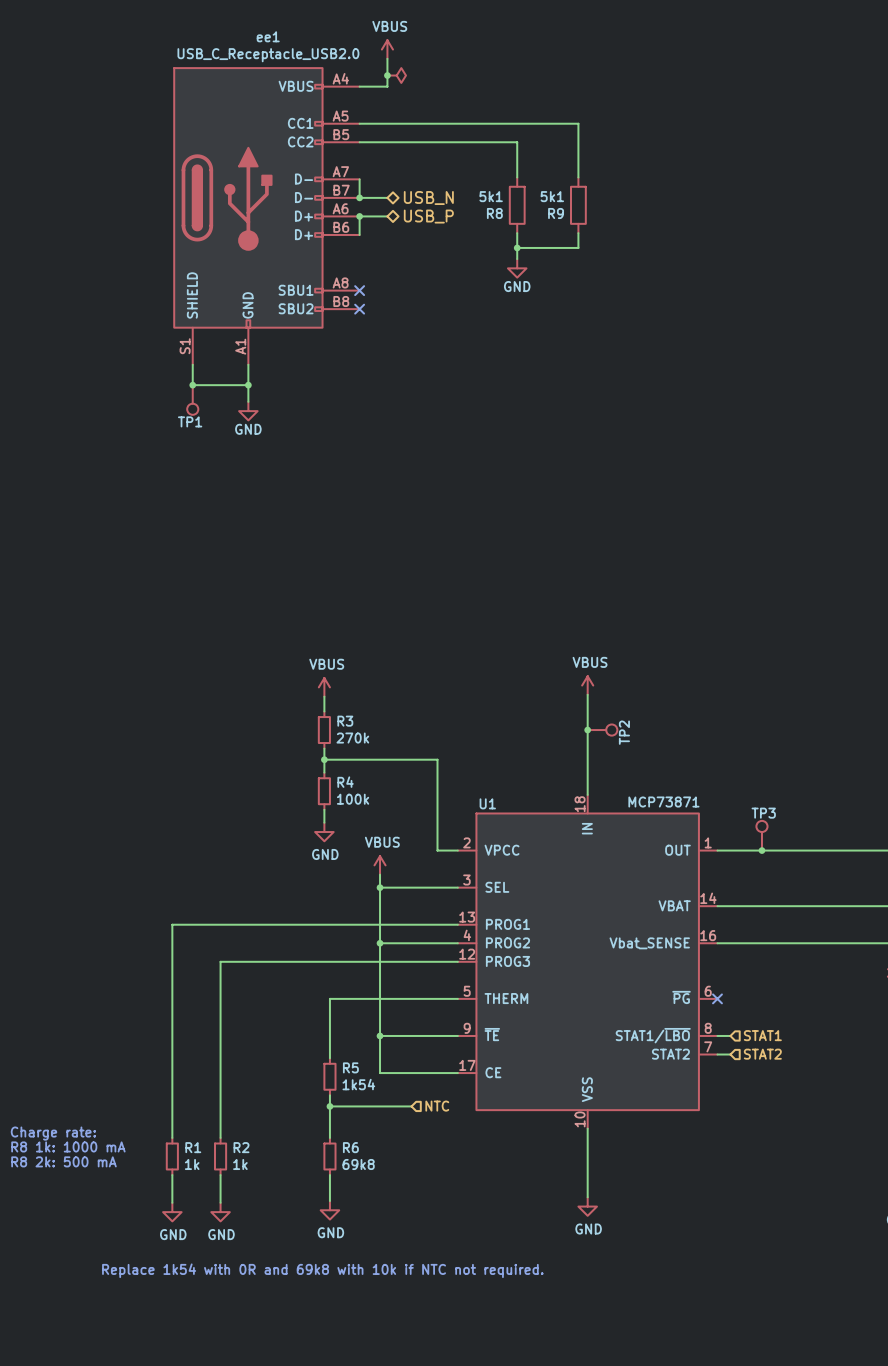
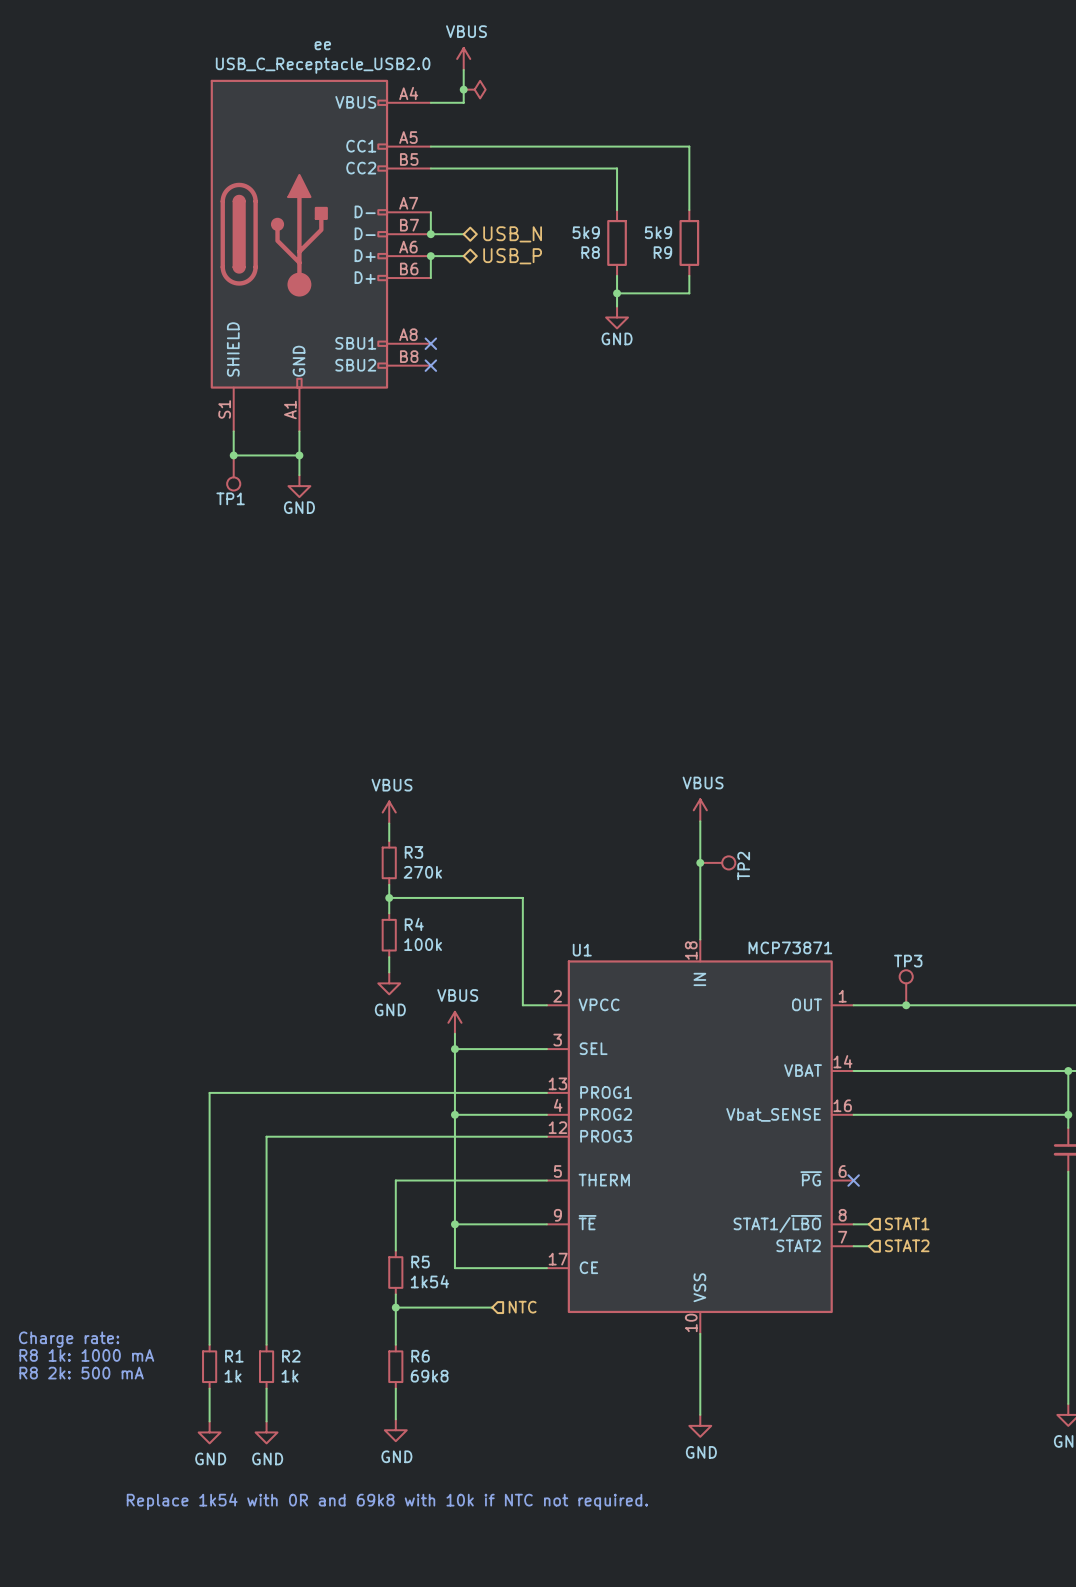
ee1 name: ee1 (268, 36) -> ee (322, 45)
R8 value: 5k1 (491, 196) -> 5k9 (586, 232)
R9 value: 5k1 (552, 196) -> 5k9 (658, 232)

